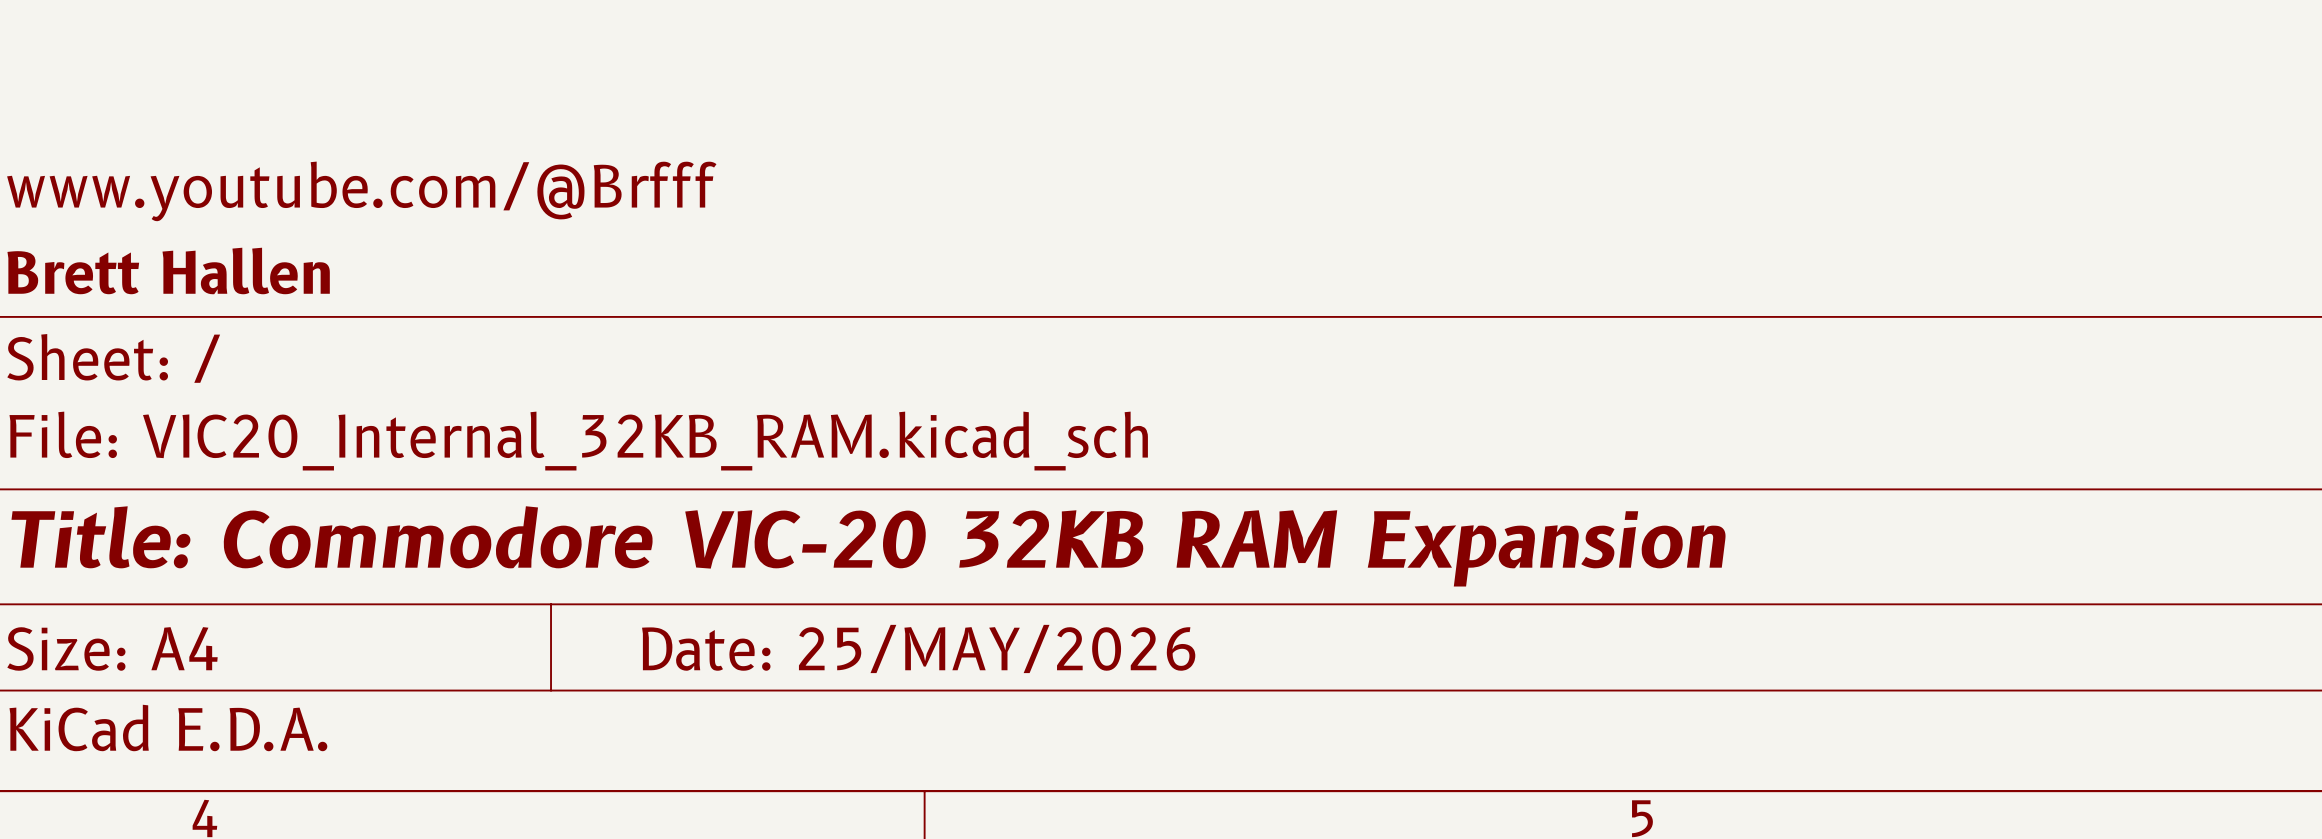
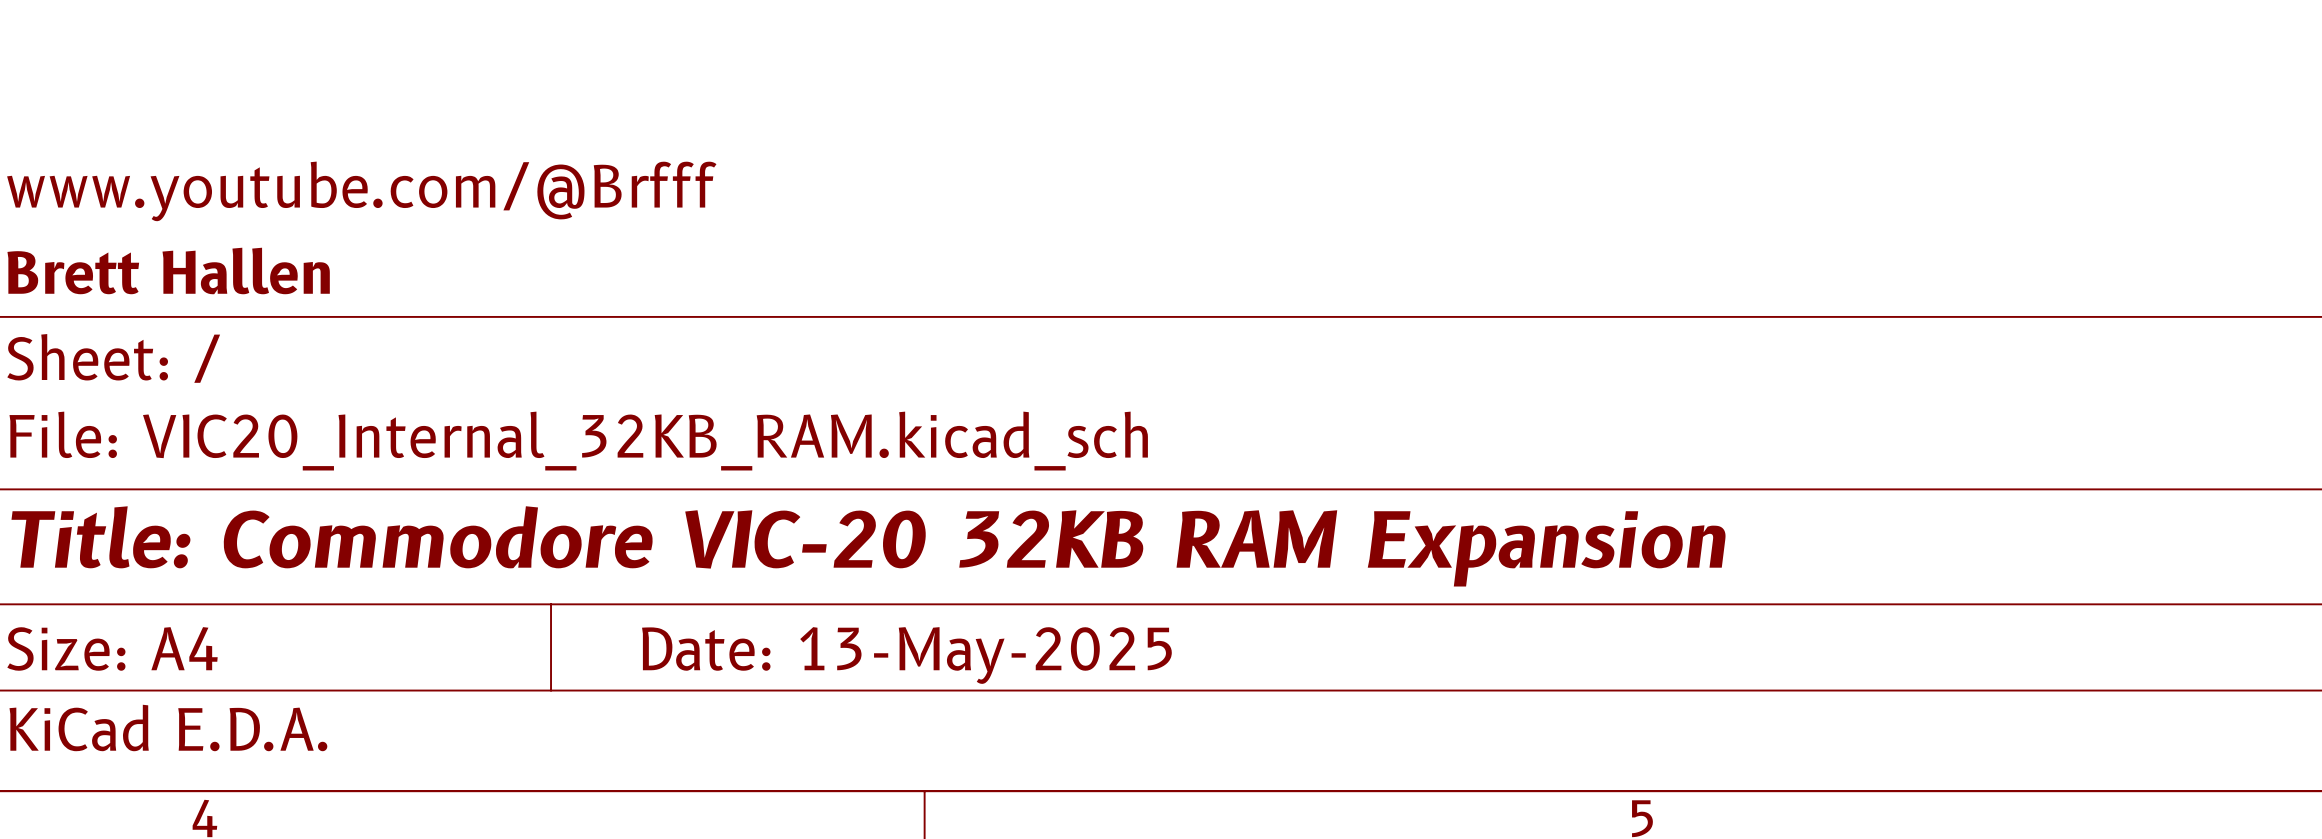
title block: Date: 25/MAY/2026 (918, 648) -> Date: 13-May-2025 (906, 655)

